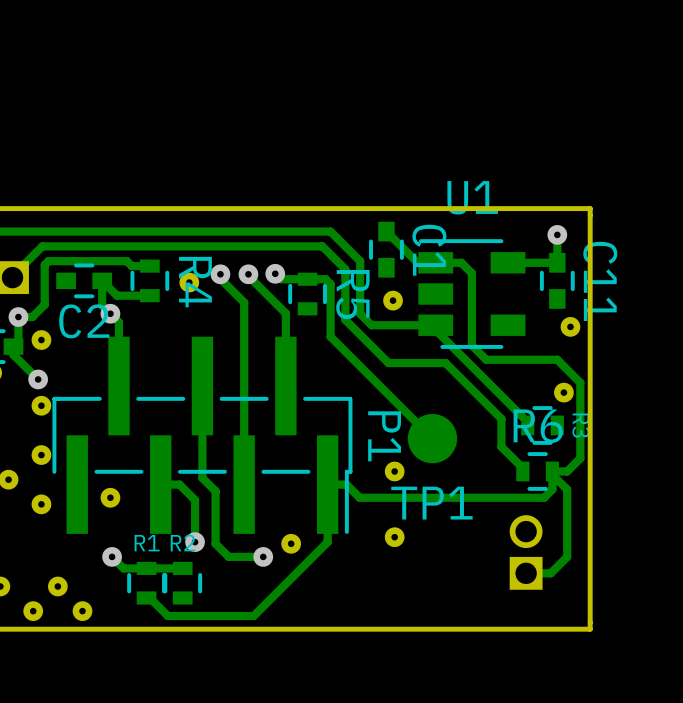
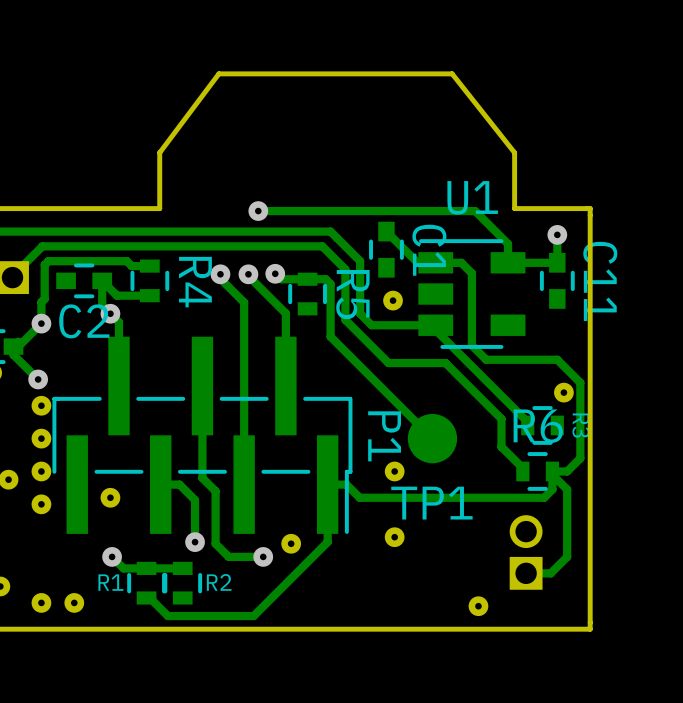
board edge: (514, 208) (159, 208) -> (514, 208) (514, 152) (452, 73) (218, 73) (159, 152) (159, 208)
track: none -> (258, 211) (475, 211) (508, 243) (508, 262)
via: none -> (258, 211)
part: (189, 282) -> none
track: (44, 298) (44, 304) (32, 317) (18, 317) (18, 341) -> (44, 298) (41, 302) (41, 323) (18, 346) (13, 346)
via position: (18, 317) -> (41, 323)
part: (570, 326) -> none
part: (41, 340) -> none
part: none -> (41, 438)
part: (41, 455) -> none
part: none -> (41, 471)
R1 name position: R1 (147, 543) -> R1 (110, 582)
R2 name position: R2 (183, 543) -> R2 (219, 582)
part: (57, 586) -> none
part: none -> (41, 602)
part: none -> (74, 602)
part: none -> (478, 606)
part: (33, 611) -> none
part: (82, 611) -> none

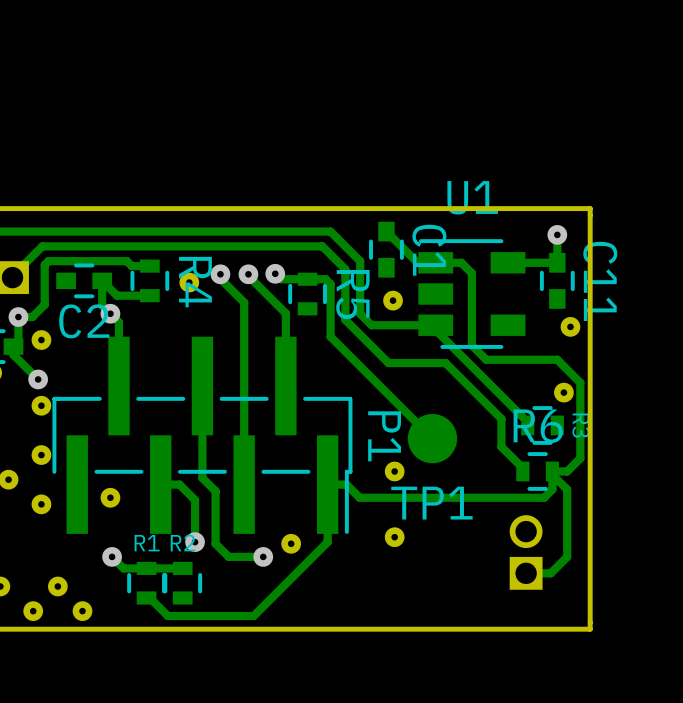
board edge: (514, 208) (514, 152) (452, 73) (218, 73) (159, 152) (159, 208) -> (514, 208) (159, 208)
track: (258, 211) (475, 211) (508, 243) (508, 262) -> none
via: (258, 211) -> none
part: none -> (189, 282)
track: (44, 298) (41, 302) (41, 323) (18, 346) (13, 346) -> (44, 298) (44, 304) (32, 317) (18, 317) (18, 341)
via position: (41, 323) -> (18, 317)
part: none -> (570, 326)
part: none -> (41, 340)
part: (41, 438) -> none
part: none -> (41, 455)
part: (41, 471) -> none
R1 name position: R1 (110, 582) -> R1 (147, 543)
R2 name position: R2 (219, 582) -> R2 (183, 543)
part: none -> (57, 586)
part: (41, 602) -> none
part: (74, 602) -> none
part: (478, 606) -> none
part: none -> (33, 611)
part: none -> (82, 611)

